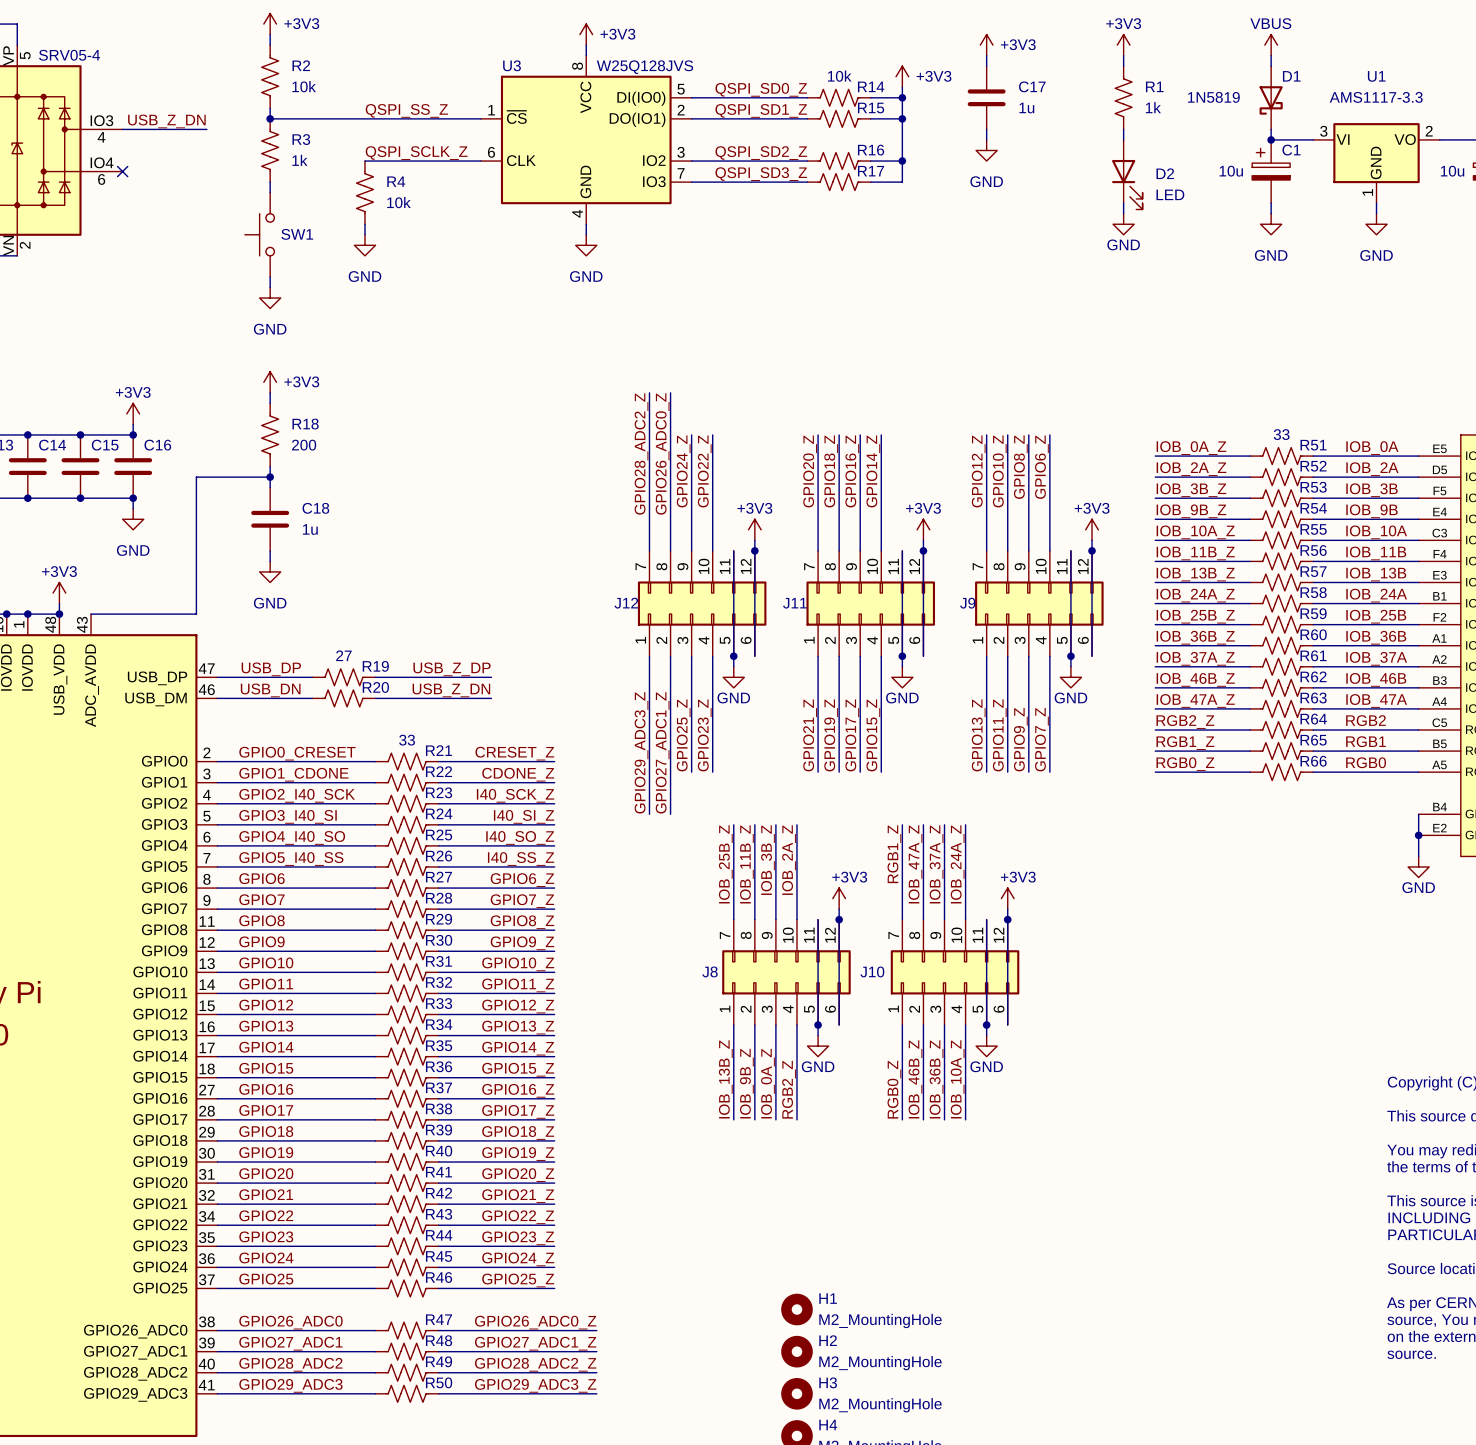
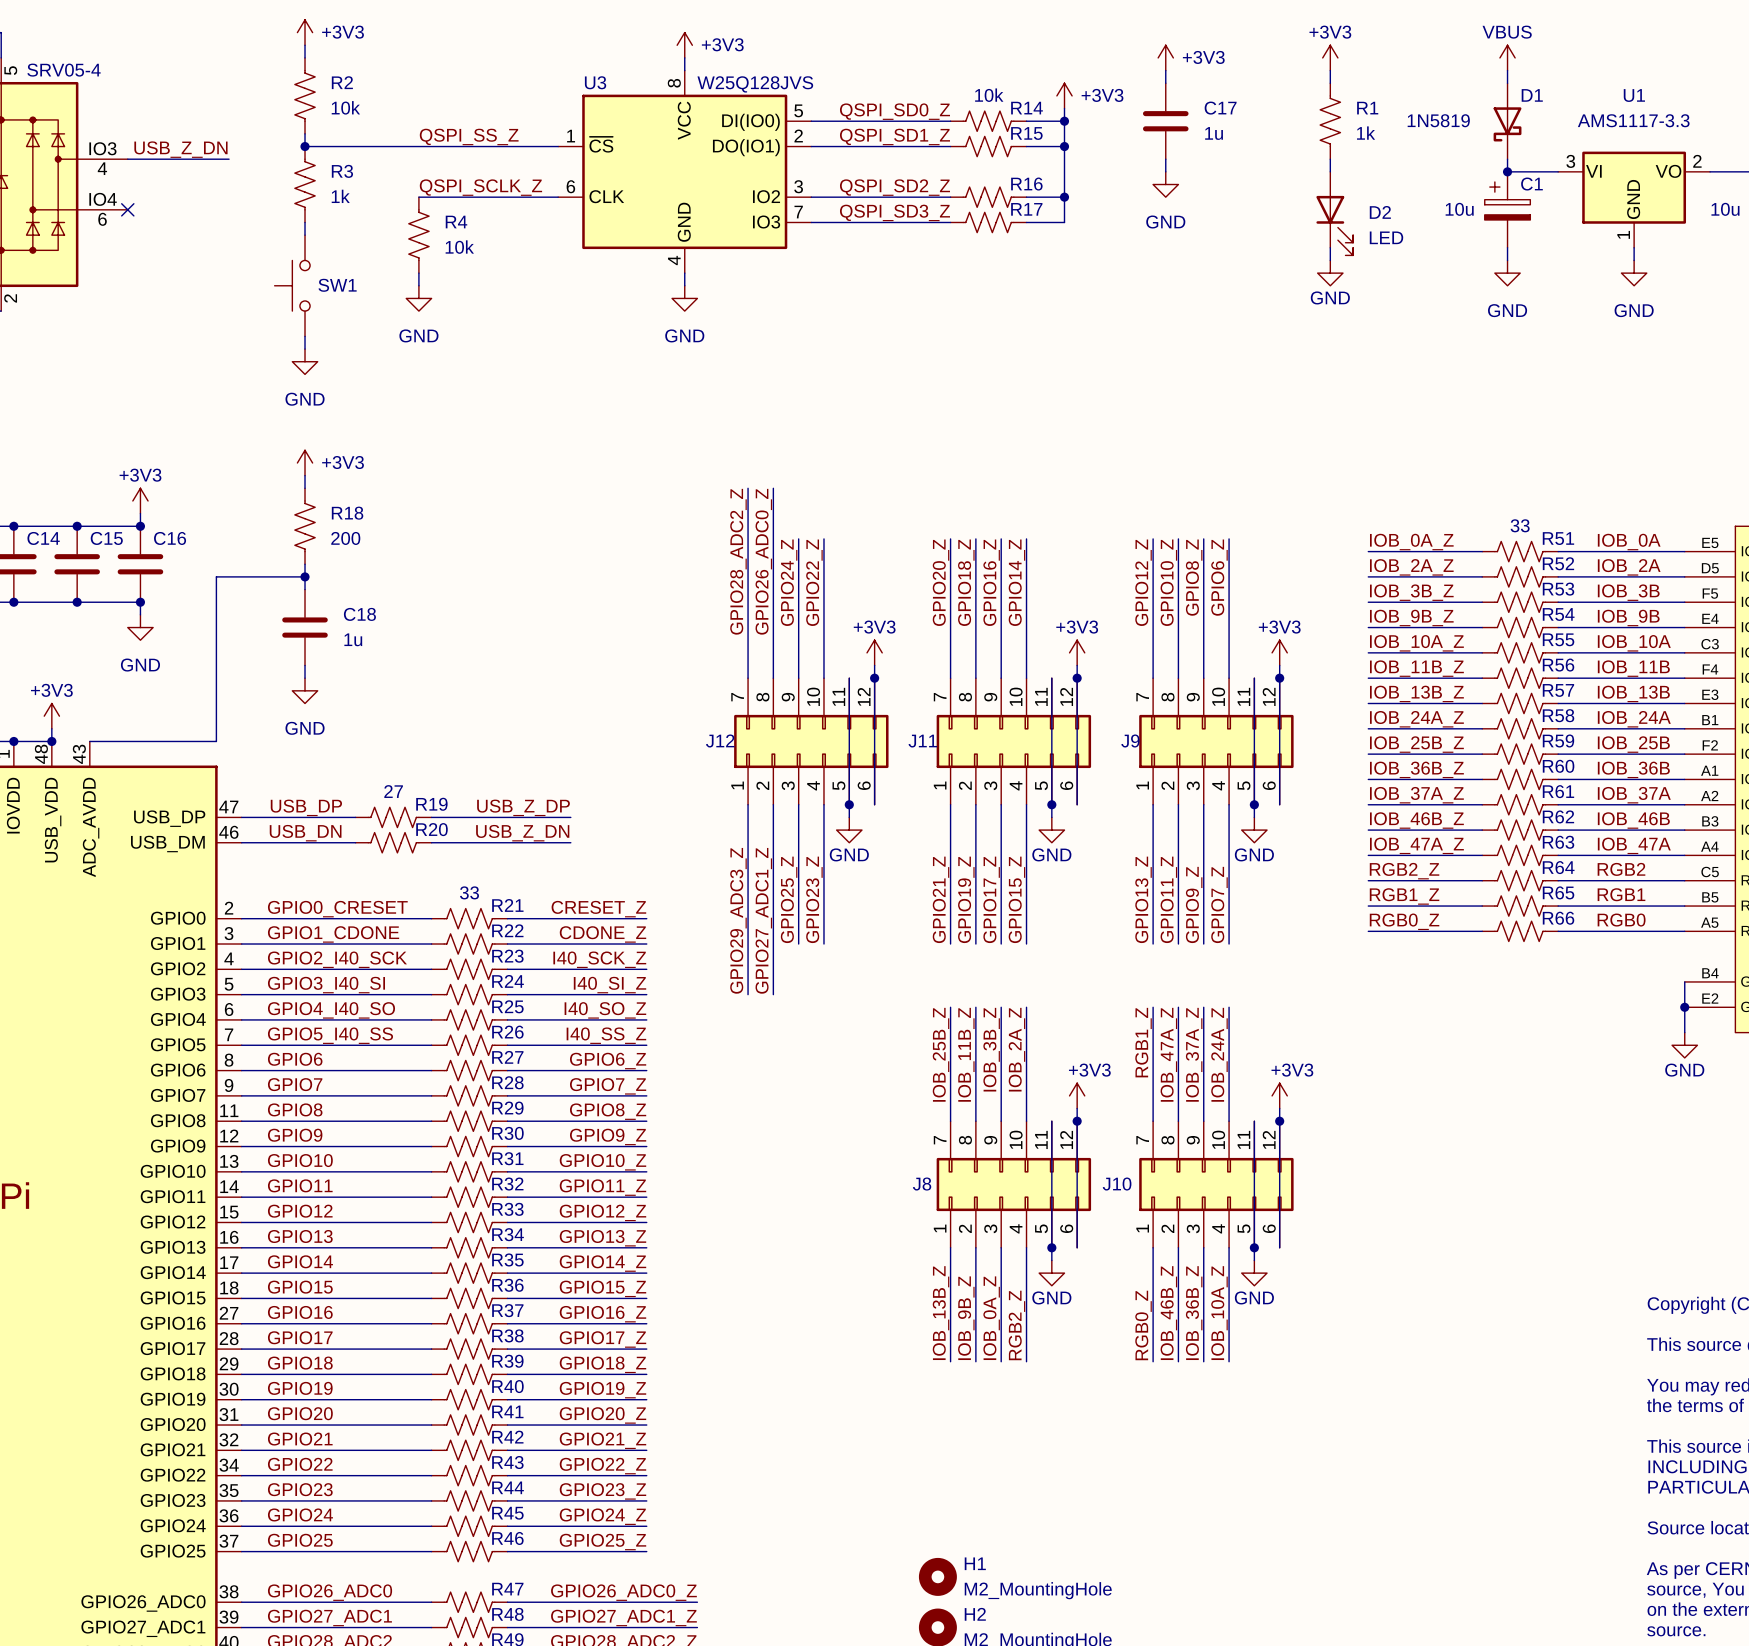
wire: (649, 392) (649, 550) -> (748, 488) (748, 678)
wire: (670, 392) (670, 550) -> (773, 488) (773, 678)
wire: (691, 434) (691, 550) -> (798, 538) (798, 678)
wire: (712, 434) (712, 550) -> (823, 538) (823, 678)
wire: (818, 434) (818, 550) -> (950, 538) (950, 678)
wire: (839, 434) (839, 550) -> (975, 538) (975, 678)
wire: (860, 434) (860, 550) -> (1001, 538) (1001, 678)
wire: (881, 434) (881, 550) -> (1026, 538) (1026, 678)
wire: (986, 434) (986, 550) -> (1153, 538) (1153, 678)
wire: (1007, 434) (1007, 550) -> (1178, 538) (1178, 678)
wire: (1028, 434) (1028, 550) -> (1203, 538) (1203, 678)
wire: (1049, 434) (1049, 550) -> (1229, 538) (1229, 678)
label position: GPIO28_ADC2_Z (641, 453) -> GPIO28_ADC2_Z (738, 561)
label position: GPIO26_ADC0_Z (662, 453) -> GPIO26_ADC0_Z (763, 561)
label position: GPIO8_Z (1020, 467) -> GPIO8_Z (1194, 577)
label position: GPIO6_Z (1041, 467) -> GPIO6_Z (1219, 577)
label position: GPIO24_Z (683, 471) -> GPIO24_Z (789, 582)
label position: GPIO22_Z (704, 471) -> GPIO22_Z (814, 582)
label position: GPIO20_Z (810, 471) -> GPIO20_Z (941, 582)
label position: GPIO18_Z (831, 471) -> GPIO18_Z (966, 582)
label position: GPIO16_Z (852, 471) -> GPIO16_Z (991, 582)
label position: GPIO14_Z (873, 471) -> GPIO14_Z (1016, 582)
label position: GPIO12_Z (978, 471) -> GPIO12_Z (1143, 582)
label position: GPIO10_Z (999, 471) -> GPIO10_Z (1168, 582)
power symbol position: +3V3 (754, 529) -> +3V3 (874, 652)
power symbol position: +3V3 (923, 529) -> +3V3 (1077, 652)
power symbol position: +3V3 (1092, 529) -> +3V3 (1279, 652)
wire: (754, 540) (754, 656) -> (874, 665) (874, 804)
wire: (923, 540) (923, 656) -> (1077, 665) (1077, 804)
wire: (1092, 540) (1092, 656) -> (1279, 665) (1279, 804)
wire: (733, 550) (733, 666) -> (849, 678) (849, 817)
junction position: (754, 550) -> (874, 678)
wire: (902, 550) (902, 666) -> (1051, 678) (1051, 817)
junction position: (923, 550) -> (1077, 678)
wire: (1070, 550) (1070, 666) -> (1254, 678) (1254, 817)
junction position: (1092, 550) -> (1279, 678)
J12 position: (702, 603) -> (811, 741)
J11 position: (870, 603) -> (1013, 741)
J9 position: (1039, 603) -> (1216, 741)
wire: (649, 656) (649, 814) -> (748, 804) (748, 994)
wire: (670, 656) (670, 814) -> (773, 804) (773, 994)
wire: (691, 656) (691, 772) -> (798, 804) (798, 944)
wire: (712, 656) (712, 772) -> (823, 804) (823, 944)
junction position: (733, 656) -> (849, 804)
wire: (818, 656) (818, 772) -> (950, 804) (950, 944)
wire: (839, 656) (839, 772) -> (975, 804) (975, 944)
wire: (860, 656) (860, 772) -> (1001, 804) (1001, 944)
wire: (881, 656) (881, 772) -> (1026, 804) (1026, 944)
junction position: (902, 656) -> (1051, 804)
wire: (986, 656) (986, 772) -> (1153, 804) (1153, 944)
wire: (1007, 656) (1007, 772) -> (1178, 804) (1178, 944)
wire: (1028, 656) (1028, 772) -> (1203, 804) (1203, 944)
wire: (1049, 656) (1049, 772) -> (1229, 804) (1229, 944)
junction position: (1070, 656) -> (1254, 804)
power symbol position: GND (733, 677) -> GND (849, 830)
power symbol position: GND (902, 677) -> GND (1051, 830)
power symbol position: GND (1070, 677) -> GND (1254, 830)
label position: GPIO25_Z (683, 735) -> GPIO25_Z (789, 899)
label position: GPIO23_Z (704, 735) -> GPIO23_Z (814, 899)
label position: GPIO21_Z (810, 735) -> GPIO21_Z (941, 899)
label position: GPIO19_Z (831, 735) -> GPIO19_Z (966, 899)
label position: GPIO17_Z (852, 735) -> GPIO17_Z (991, 899)
label position: GPIO15_Z (873, 735) -> GPIO15_Z (1016, 899)
label position: GPIO13_Z (978, 735) -> GPIO13_Z (1143, 899)
label position: GPIO11_Z (999, 735) -> GPIO11_Z (1168, 899)
label position: GPIO9_Z (1020, 739) -> GPIO9_Z (1194, 904)
label position: GPIO7_Z (1041, 739) -> GPIO7_Z (1219, 904)
label position: GPIO29_ADC3_Z (641, 752) -> GPIO29_ADC3_Z (738, 920)
label position: GPIO27_ADC1_Z (662, 752) -> GPIO27_ADC1_Z (763, 920)
wire: (733, 824) (733, 919) -> none
wire: (754, 824) (754, 919) -> (975, 1007) (975, 1121)
wire: (775, 824) (775, 919) -> (1001, 1007) (1001, 1121)
wire: (796, 824) (796, 919) -> (950, 1007) (950, 1121)
wire: (902, 824) (902, 919) -> (1026, 1007) (1026, 1121)
wire: (923, 824) (923, 919) -> (1178, 1007) (1178, 1121)
wire: (944, 824) (944, 919) -> (1203, 1007) (1203, 1121)
wire: (965, 824) (965, 919) -> (1153, 1007) (1153, 1121)
wire: none -> (1229, 1007) (1229, 1121)
label position: RGB1_Z (894, 854) -> RGB1_Z (1143, 1042)
label position: IOB_3B_Z (767, 860) -> IOB_3B_Z (991, 1049)
label position: IOB_2A_Z (789, 860) -> IOB_2A_Z (1016, 1049)
label position: IOB_25B_Z (725, 864) -> IOB_25B_Z (941, 1054)
label position: IOB_11B_Z (746, 864) -> IOB_11B_Z (966, 1054)
label position: IOB_47A_Z (915, 864) -> IOB_47A_Z (1168, 1054)
label position: IOB_37A_Z (936, 864) -> IOB_37A_Z (1194, 1054)
label position: IOB_24A_Z (957, 864) -> IOB_24A_Z (1219, 1054)
power symbol: +3V3 (839, 898) -> none
power symbol: +3V3 (1007, 898) -> none
wire: (839, 909) (839, 1025) -> (1077, 1108) (1077, 1247)
power symbol: none -> +3V3 (1077, 1095)
wire: (1007, 909) (1007, 1025) -> (1279, 1108) (1279, 1247)
power symbol: none -> +3V3 (1279, 1095)
wire: (818, 919) (818, 1035) -> (1051, 1121) (1051, 1260)
junction: (839, 919) -> none
wire: (986, 919) (986, 1035) -> (1254, 1121) (1254, 1260)
junction: (1007, 919) -> none
junction: none -> (1077, 1121)
junction: none -> (1279, 1121)
J8 position: (786, 972) -> (1013, 1184)
J10 position: (955, 972) -> (1216, 1184)
wire: (733, 1025) (733, 1119) -> none
wire: (754, 1025) (754, 1119) -> (975, 1247) (975, 1361)
wire: (775, 1025) (775, 1119) -> (1001, 1247) (1001, 1361)
wire: (796, 1025) (796, 1119) -> (950, 1247) (950, 1361)
junction: (818, 1025) -> none
wire: (902, 1025) (902, 1119) -> (1026, 1247) (1026, 1361)
wire: (923, 1025) (923, 1119) -> (1178, 1247) (1178, 1361)
wire: (944, 1025) (944, 1119) -> (1203, 1247) (1203, 1361)
wire: (965, 1025) (965, 1119) -> (1153, 1247) (1153, 1361)
junction: (986, 1025) -> none
junction: none -> (1051, 1247)
wire: none -> (1229, 1247) (1229, 1361)
junction: none -> (1254, 1247)
power symbol: GND (818, 1046) -> none
power symbol: GND (986, 1046) -> none
power symbol: none -> GND (1051, 1273)
power symbol: none -> GND (1254, 1273)
label position: IOB_13B_Z (725, 1079) -> IOB_13B_Z (941, 1313)
label position: IOB_46B_Z (915, 1079) -> IOB_46B_Z (1168, 1313)
label position: IOB_36B_Z (936, 1079) -> IOB_36B_Z (1194, 1313)
label position: IOB_10A_Z (957, 1079) -> IOB_10A_Z (1219, 1313)
label position: IOB_9B_Z (746, 1083) -> IOB_9B_Z (966, 1318)
label position: IOB_0A_Z (767, 1083) -> IOB_0A_Z (991, 1318)
label position: RGB2_Z (789, 1089) -> RGB2_Z (1016, 1325)
label position: RGB0_Z (894, 1089) -> RGB0_Z (1143, 1325)

